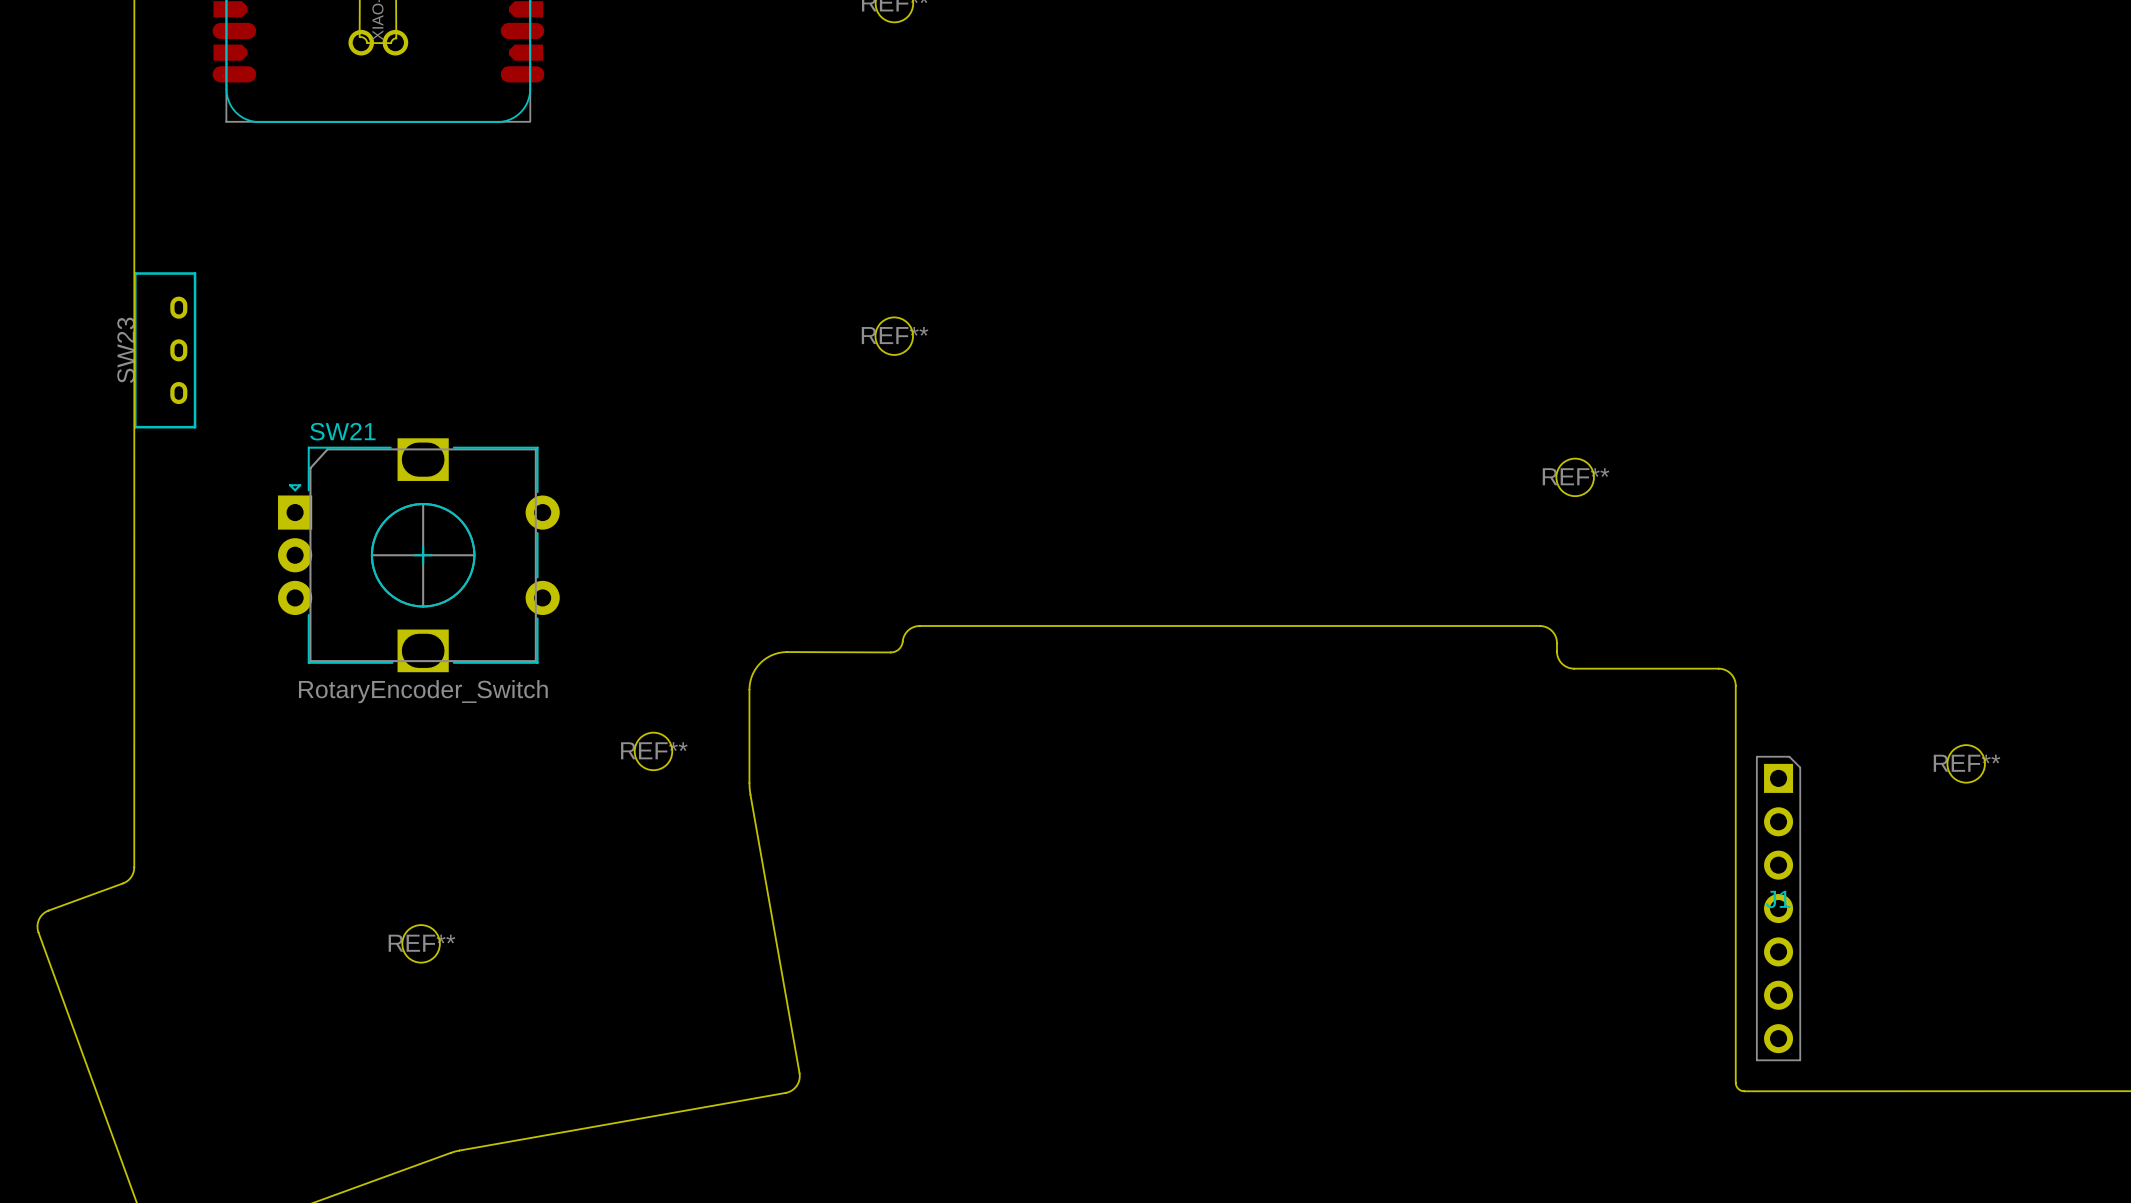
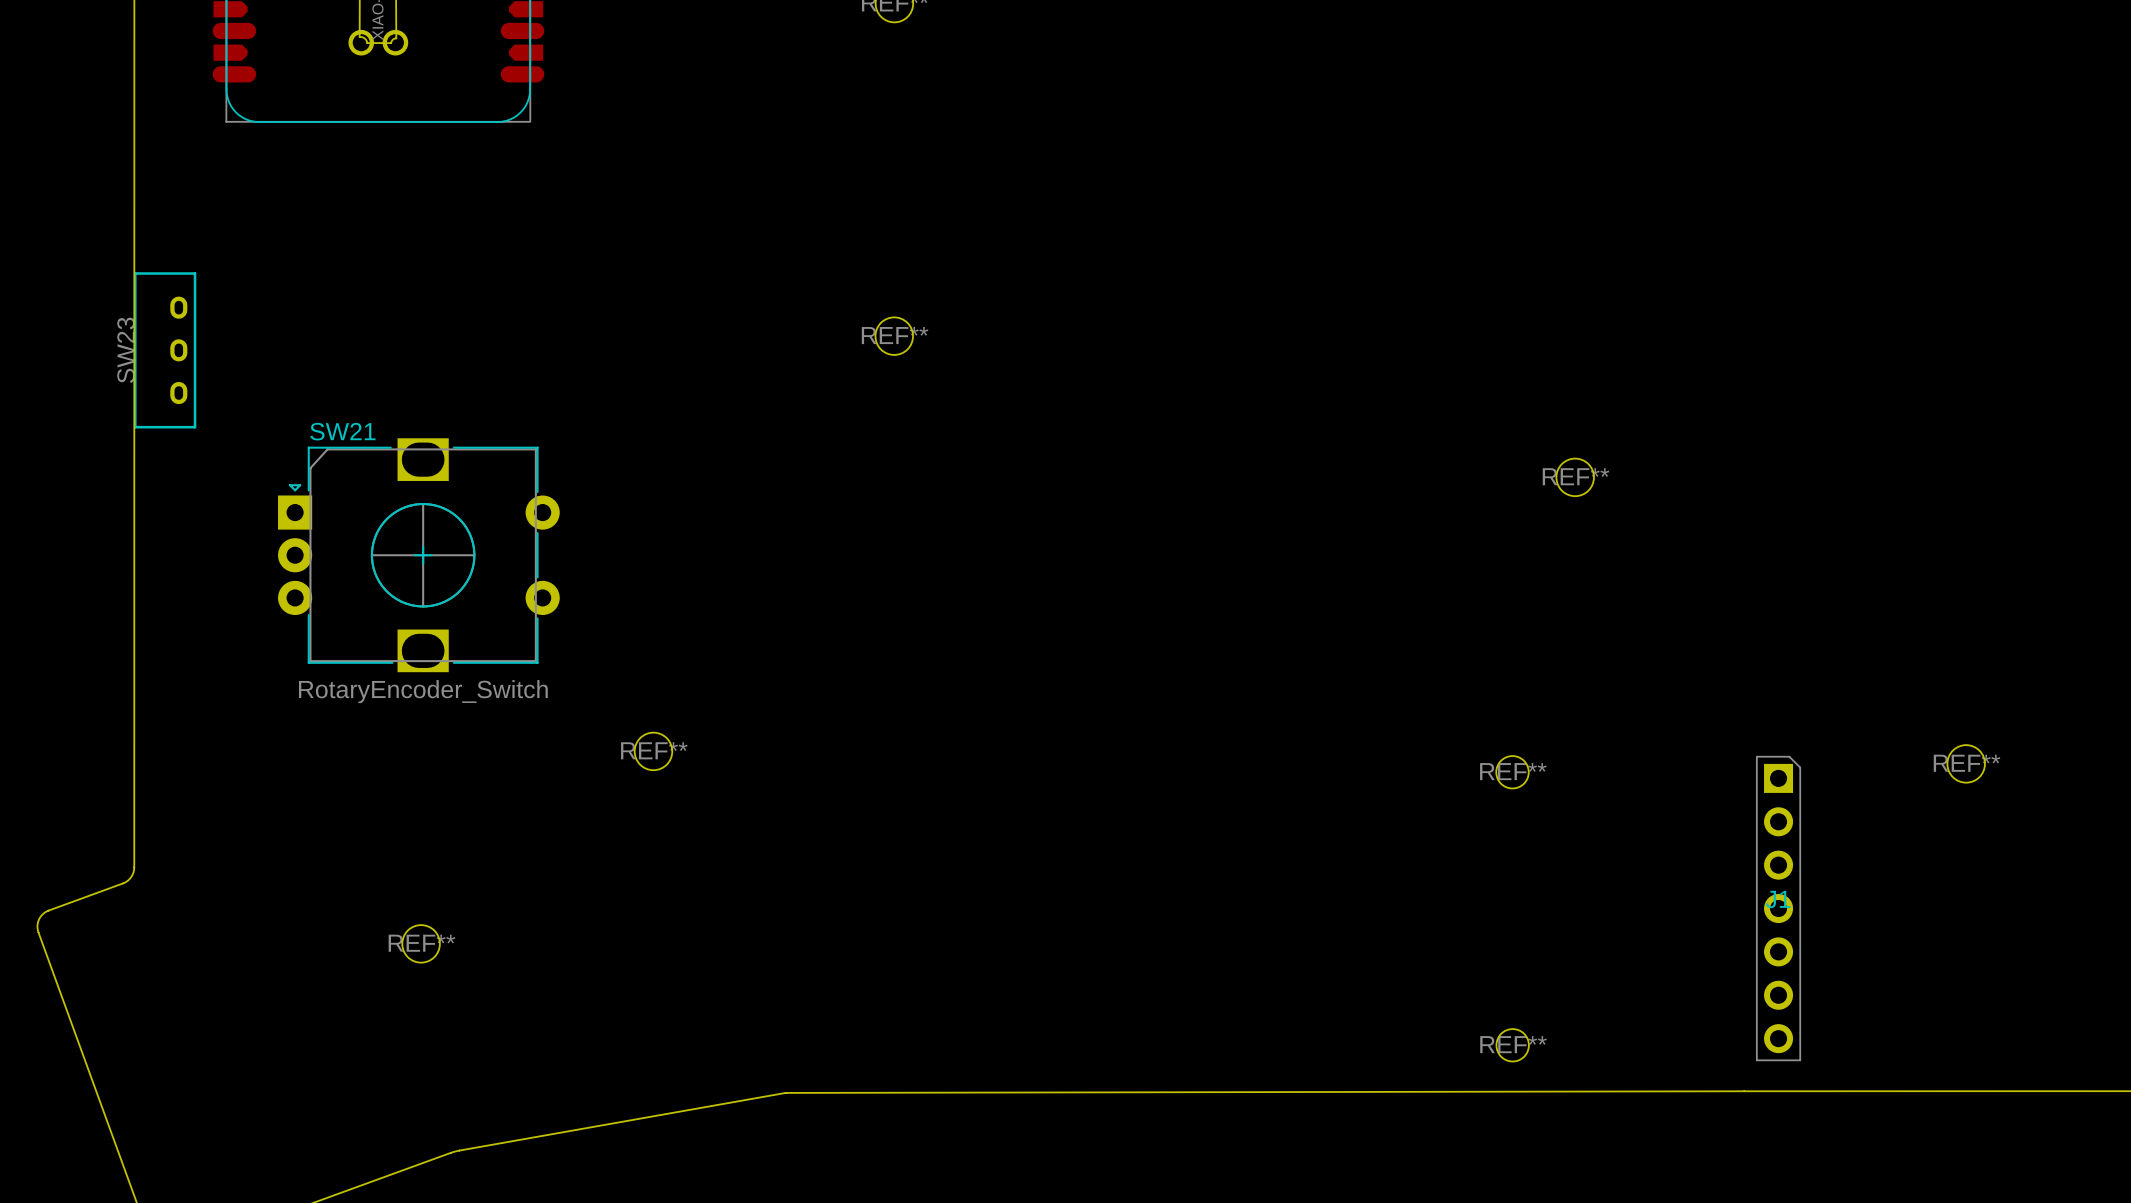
REF**: none -> (1512, 772)
REF**: none -> (1512, 1045)
board edge: (1744, 1091) (1738, 1088) (1735, 1082) (1735, 685) (1733, 676) (1727, 671) (1718, 668) (1570, 668) (1563, 664) (1558, 659) (1556, 639) (1553, 632) (1547, 627) (1539, 625) (919, 625) (908, 630) (900, 647) (893, 652) (787, 652) (774, 654) (757, 666) (750, 681) (749, 788) (799, 1075) (796, 1085) (785, 1092) -> (1744, 1091) (785, 1092)

